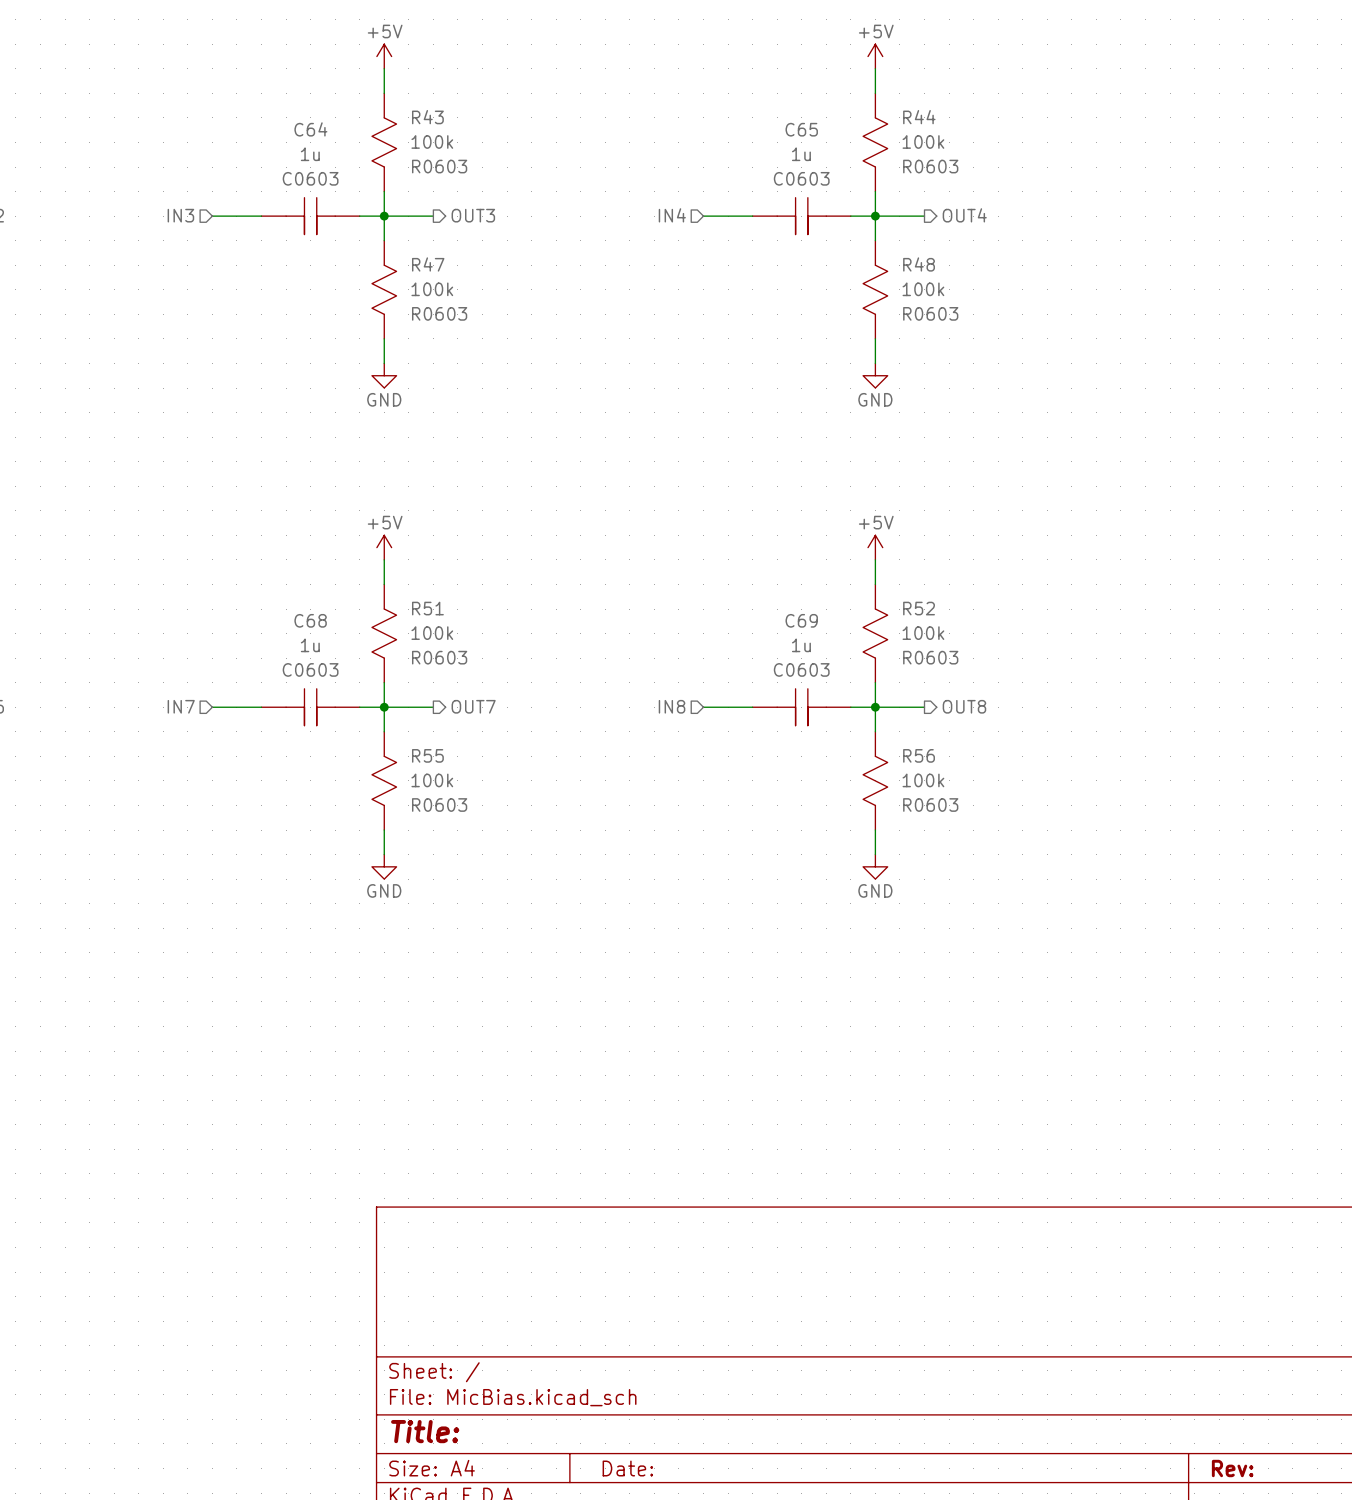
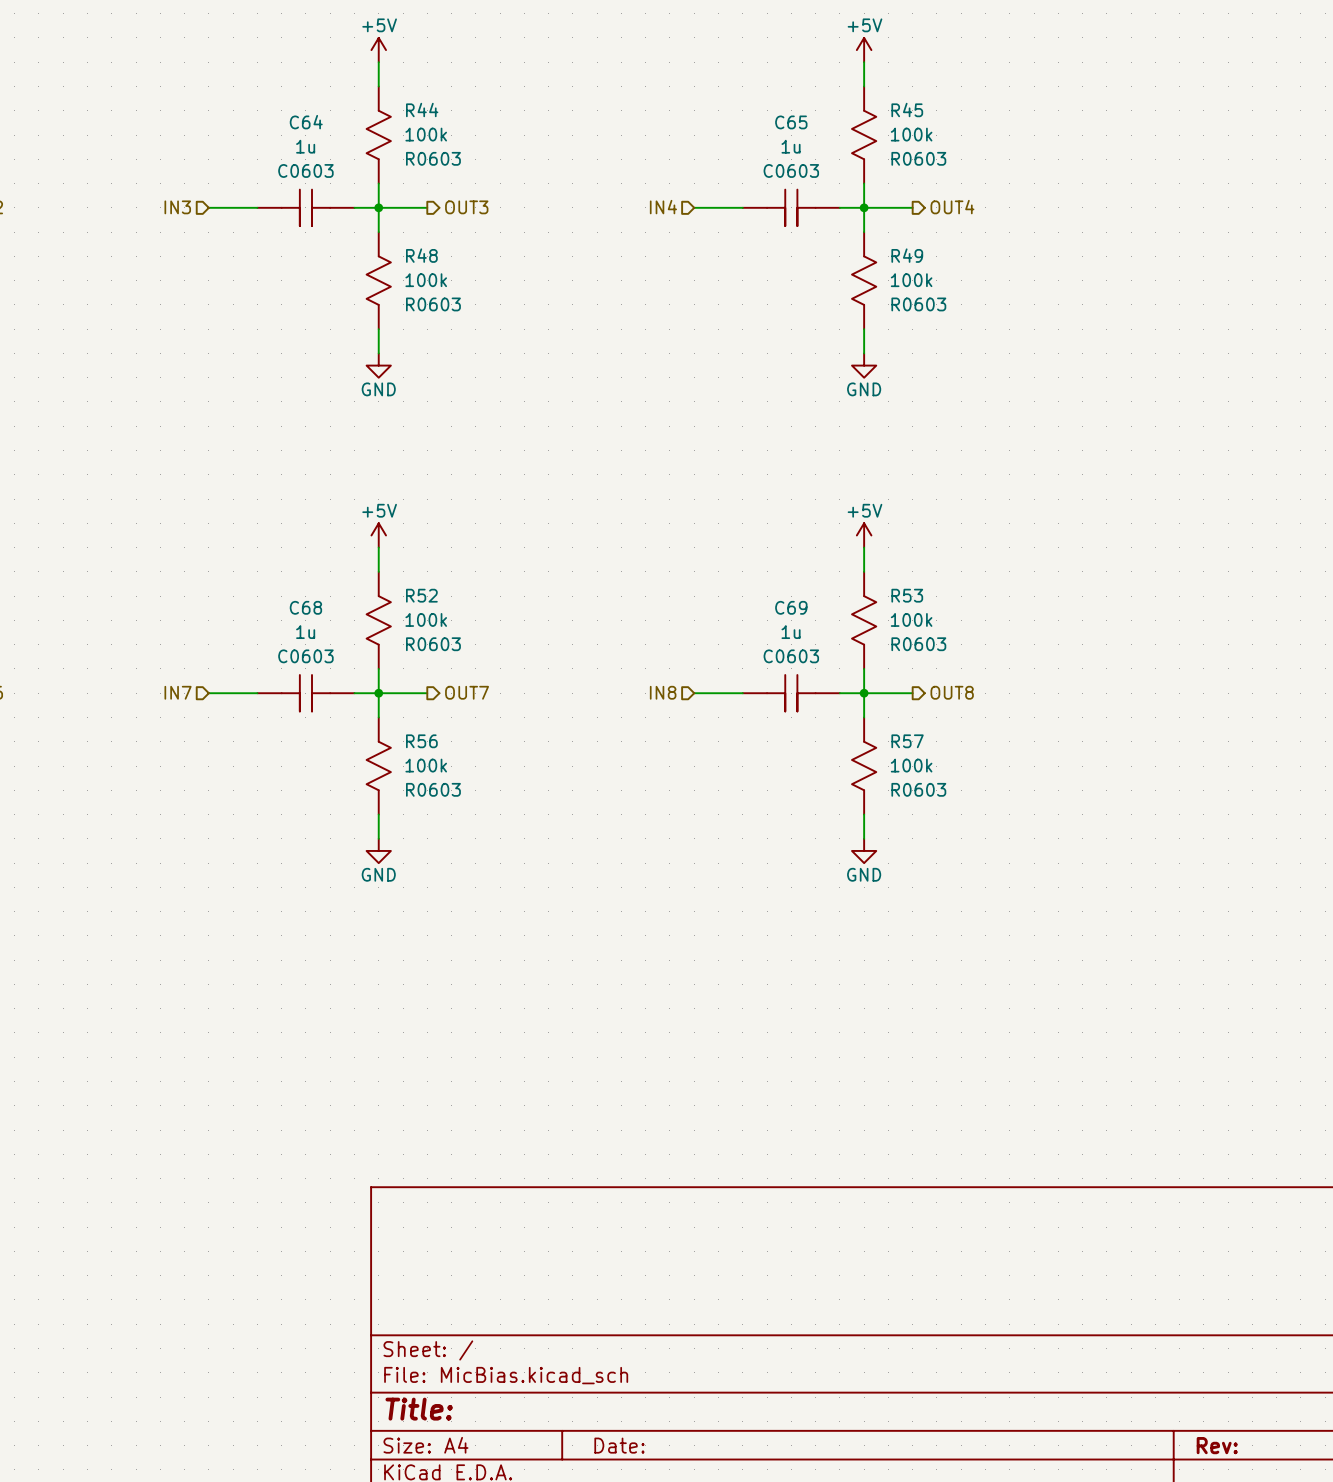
R43 name: R43 (427, 117) -> R44 (422, 110)
R44 name: R44 (919, 117) -> R45 (907, 110)
R47 name: R47 (428, 264) -> R48 (421, 255)
R48 name: R48 (919, 264) -> R49 (907, 255)
R51 name: R51 (427, 608) -> R52 (421, 595)
R52 name: R52 (919, 608) -> R53 (907, 595)
R55 name: R55 (427, 755) -> R56 (421, 741)
R56 name: R56 (919, 755) -> R57 (907, 741)

